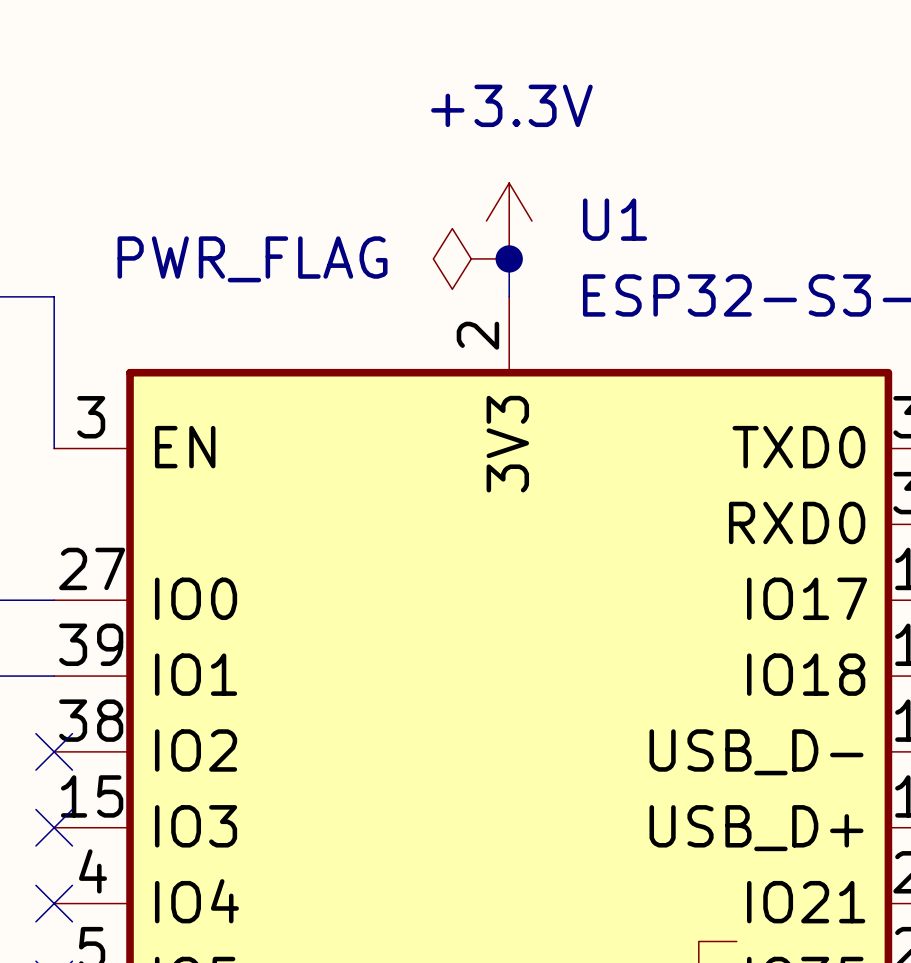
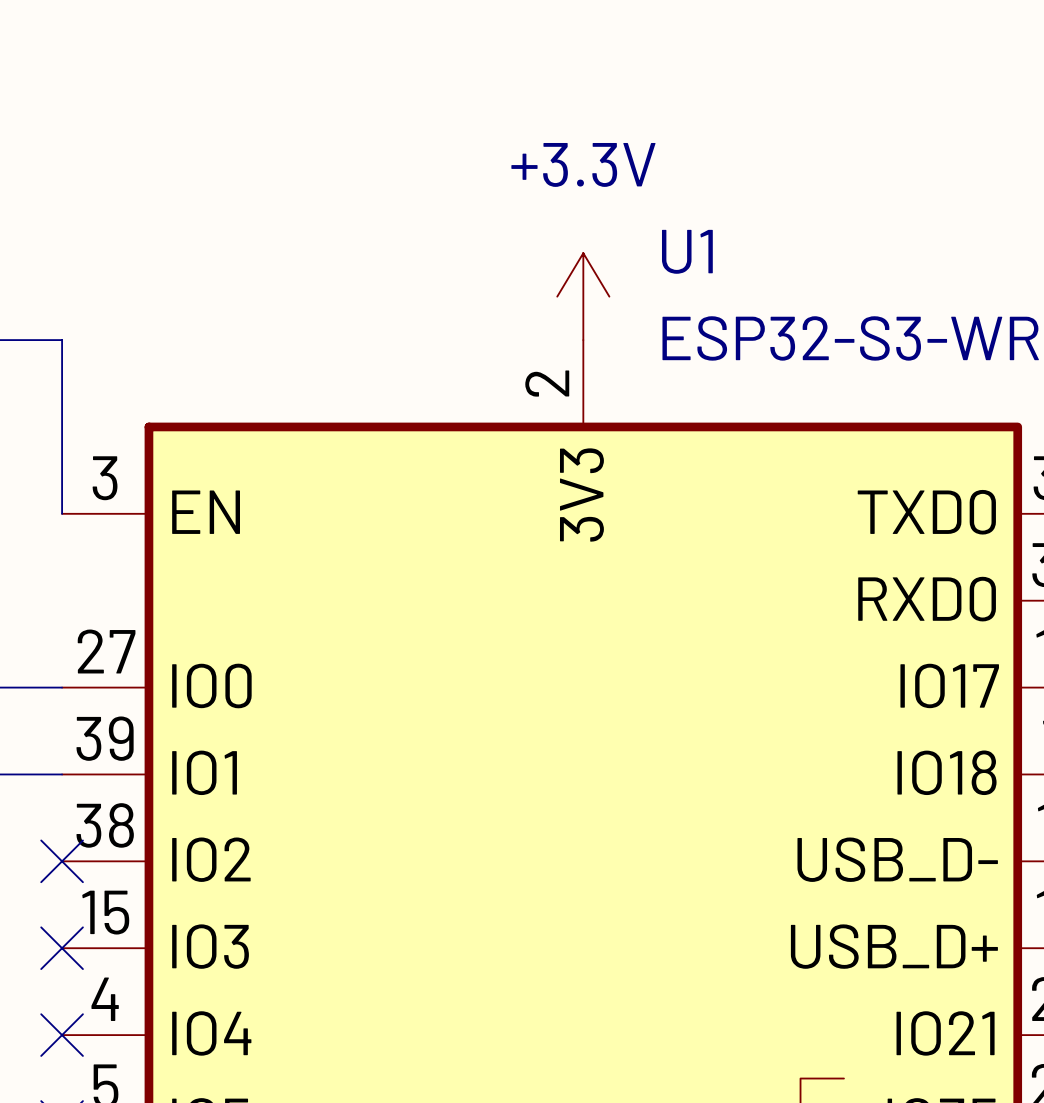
power symbol position: +3.3V (509, 221) -> +3.3V (583, 296)
power symbol: PWR_FLAG (471, 258) -> none
junction: (509, 258) -> none

